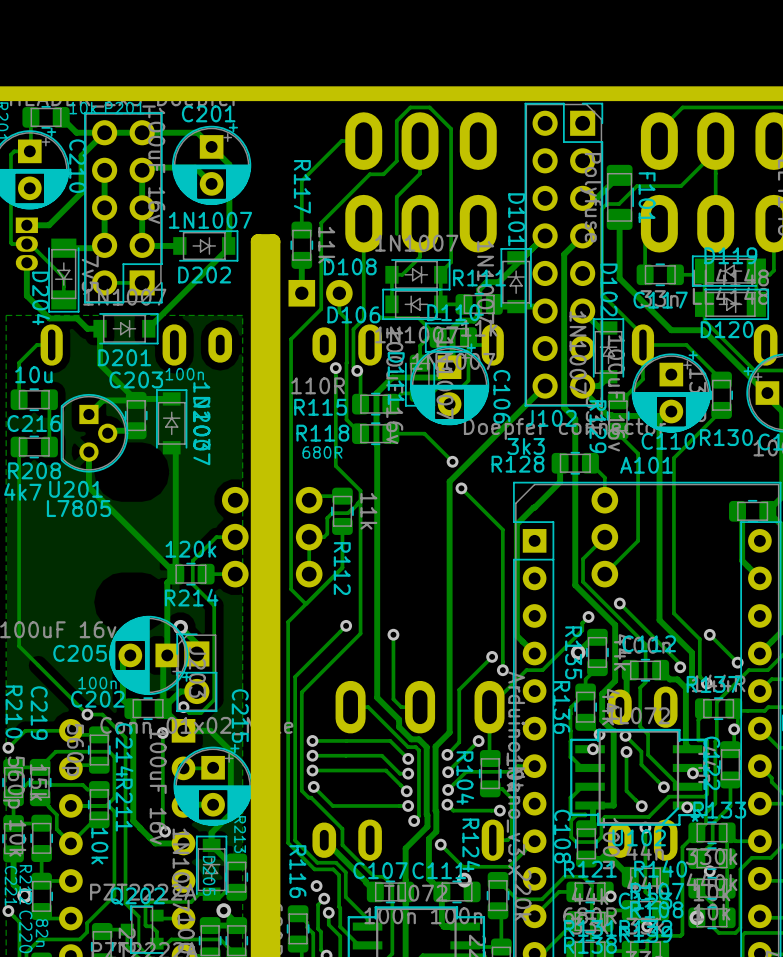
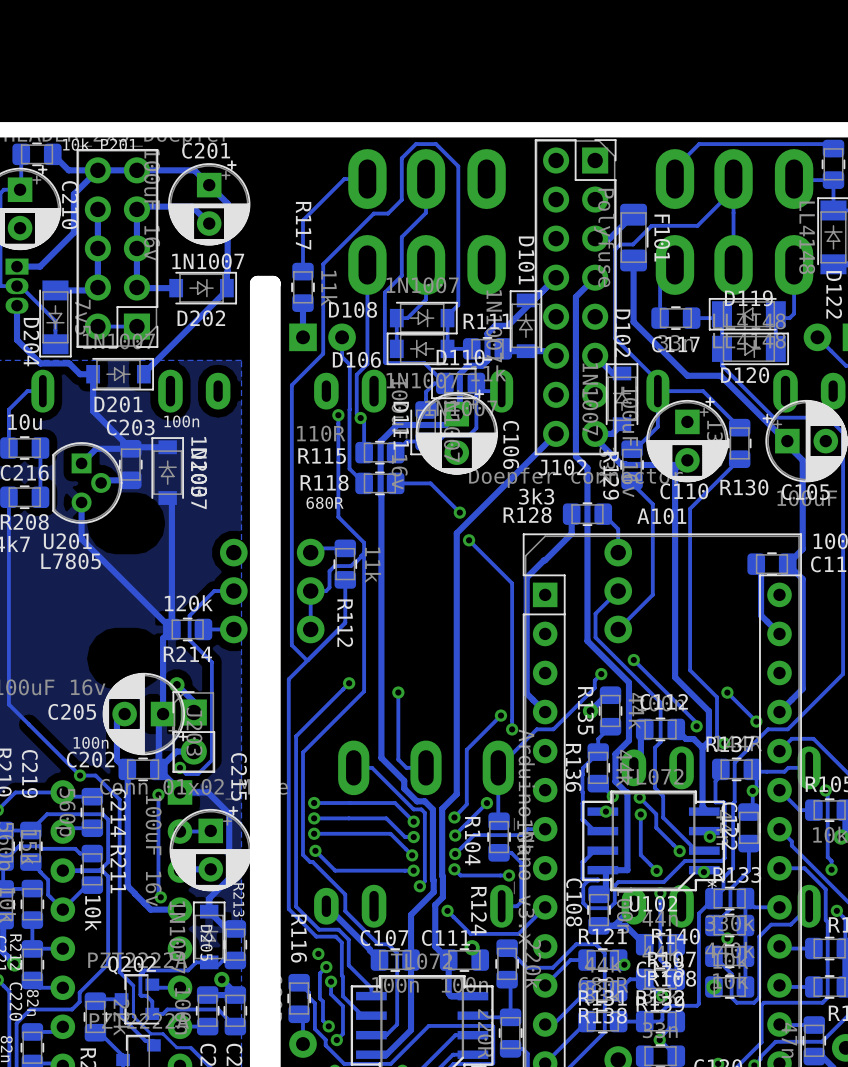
track: none -> (401, 275) (384, 292) (384, 362)

